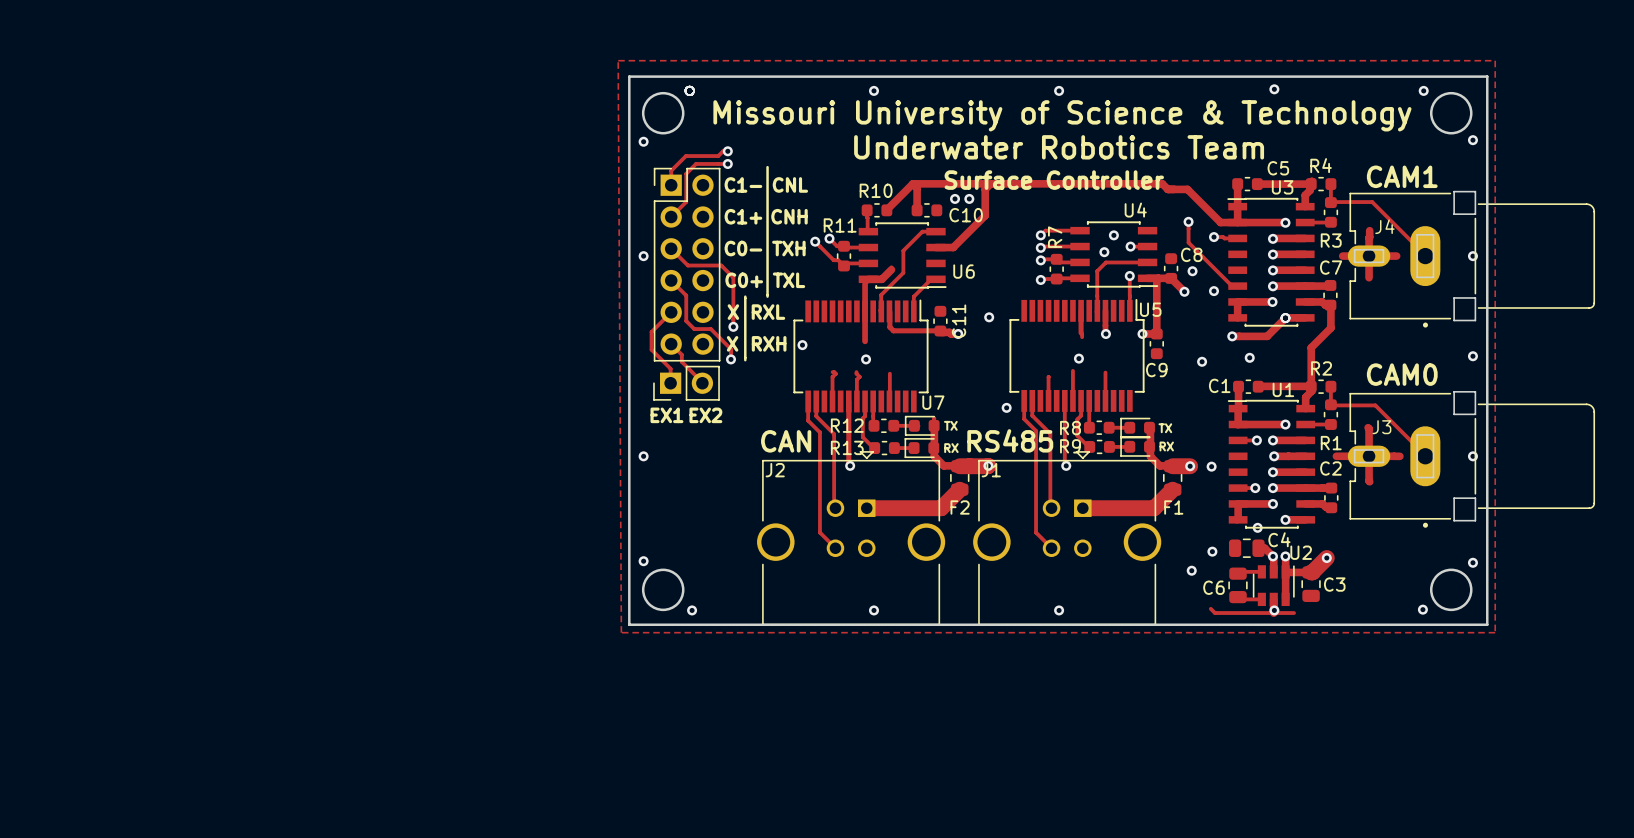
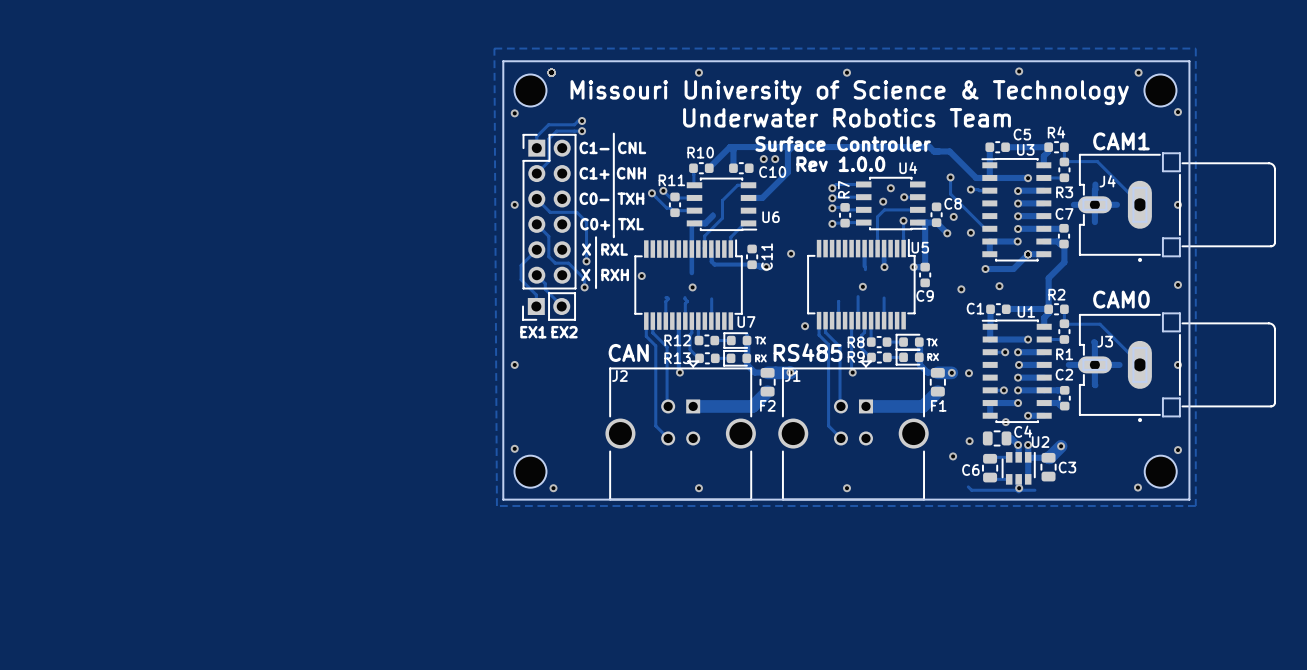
round board edge: [641, 91, 685, 135] -> none
round board edge: [1429, 91, 1473, 135] -> none
part: none -> (530, 90)
part: none -> (1160, 90)
text: none -> Rev 1.0.0 (840, 164)
round board edge: [641, 568, 685, 612] -> none
round board edge: [1429, 568, 1473, 612] -> none
part: none -> (530, 471)
part: none -> (1160, 471)

